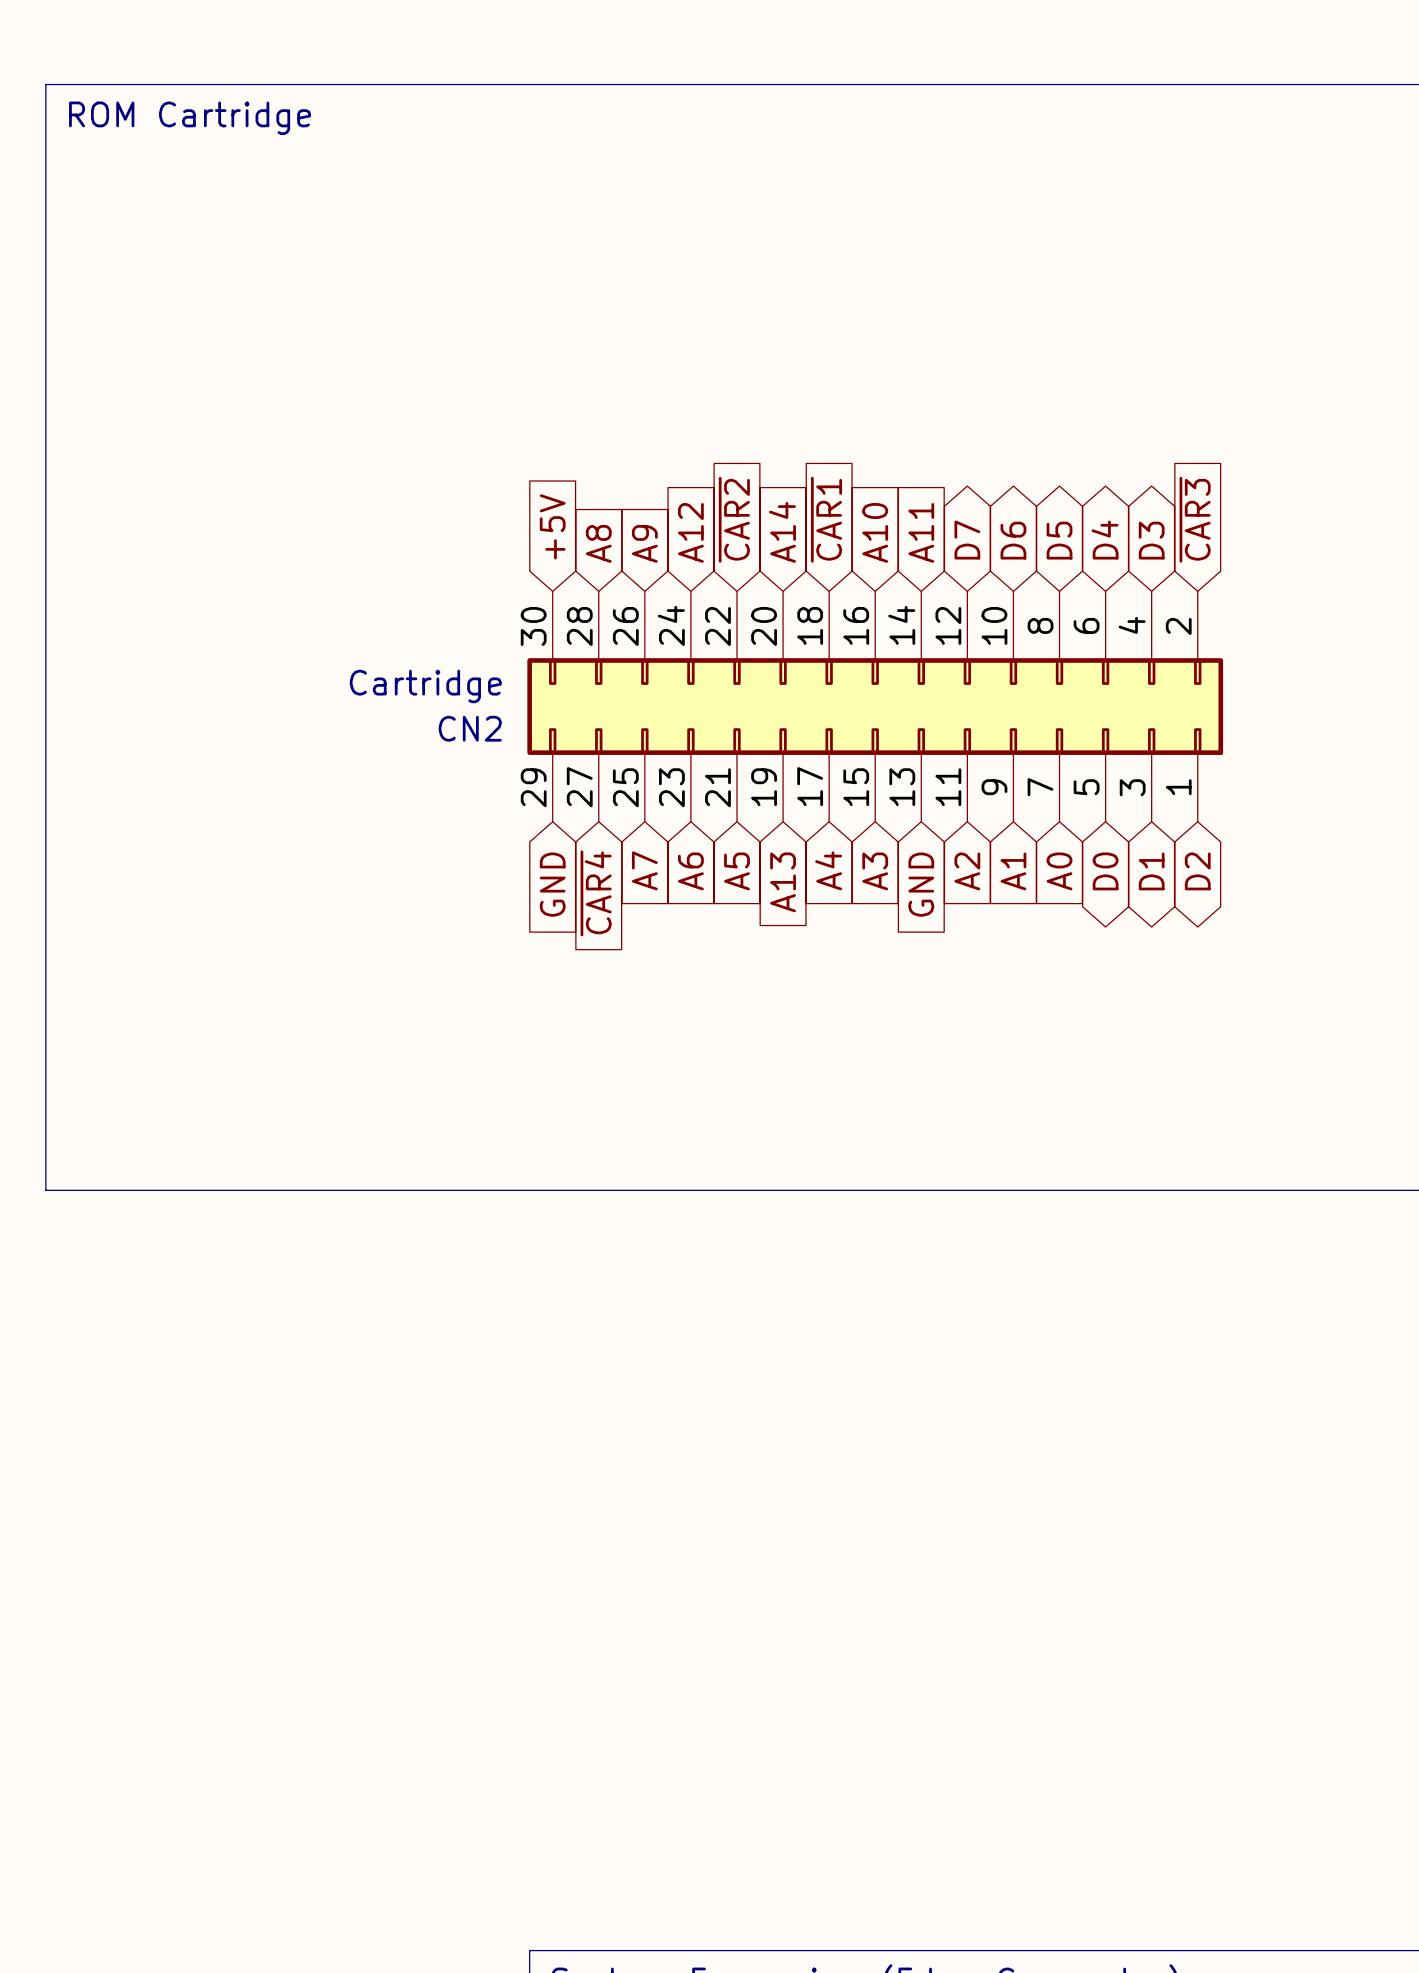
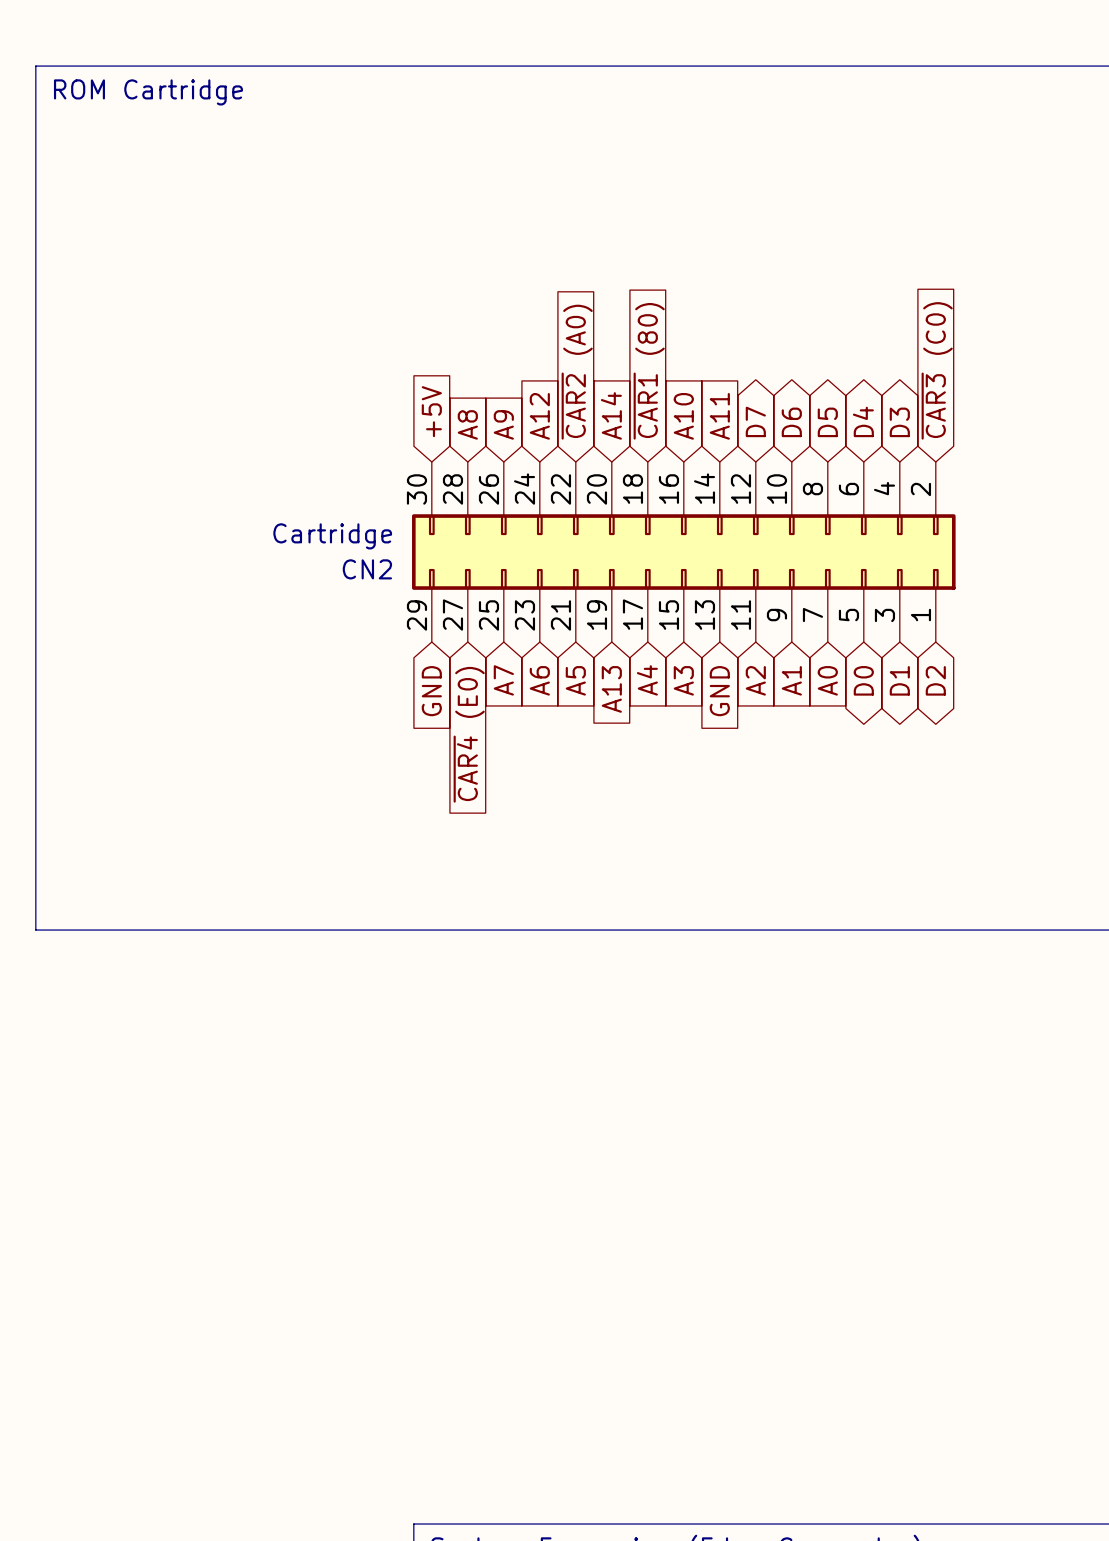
global label: ~{CAR2} (734, 519) -> ~{CAR2} (A0) (577, 372)
global label: ~{CAR1} (826, 519) -> ~{CAR1} (80) (649, 371)
global label: ~{CAR3} (1195, 519) -> ~{CAR3} (C0) (937, 370)
global label: ~{CAR4} (596, 893) -> ~{CAR4} (E0) (469, 734)

